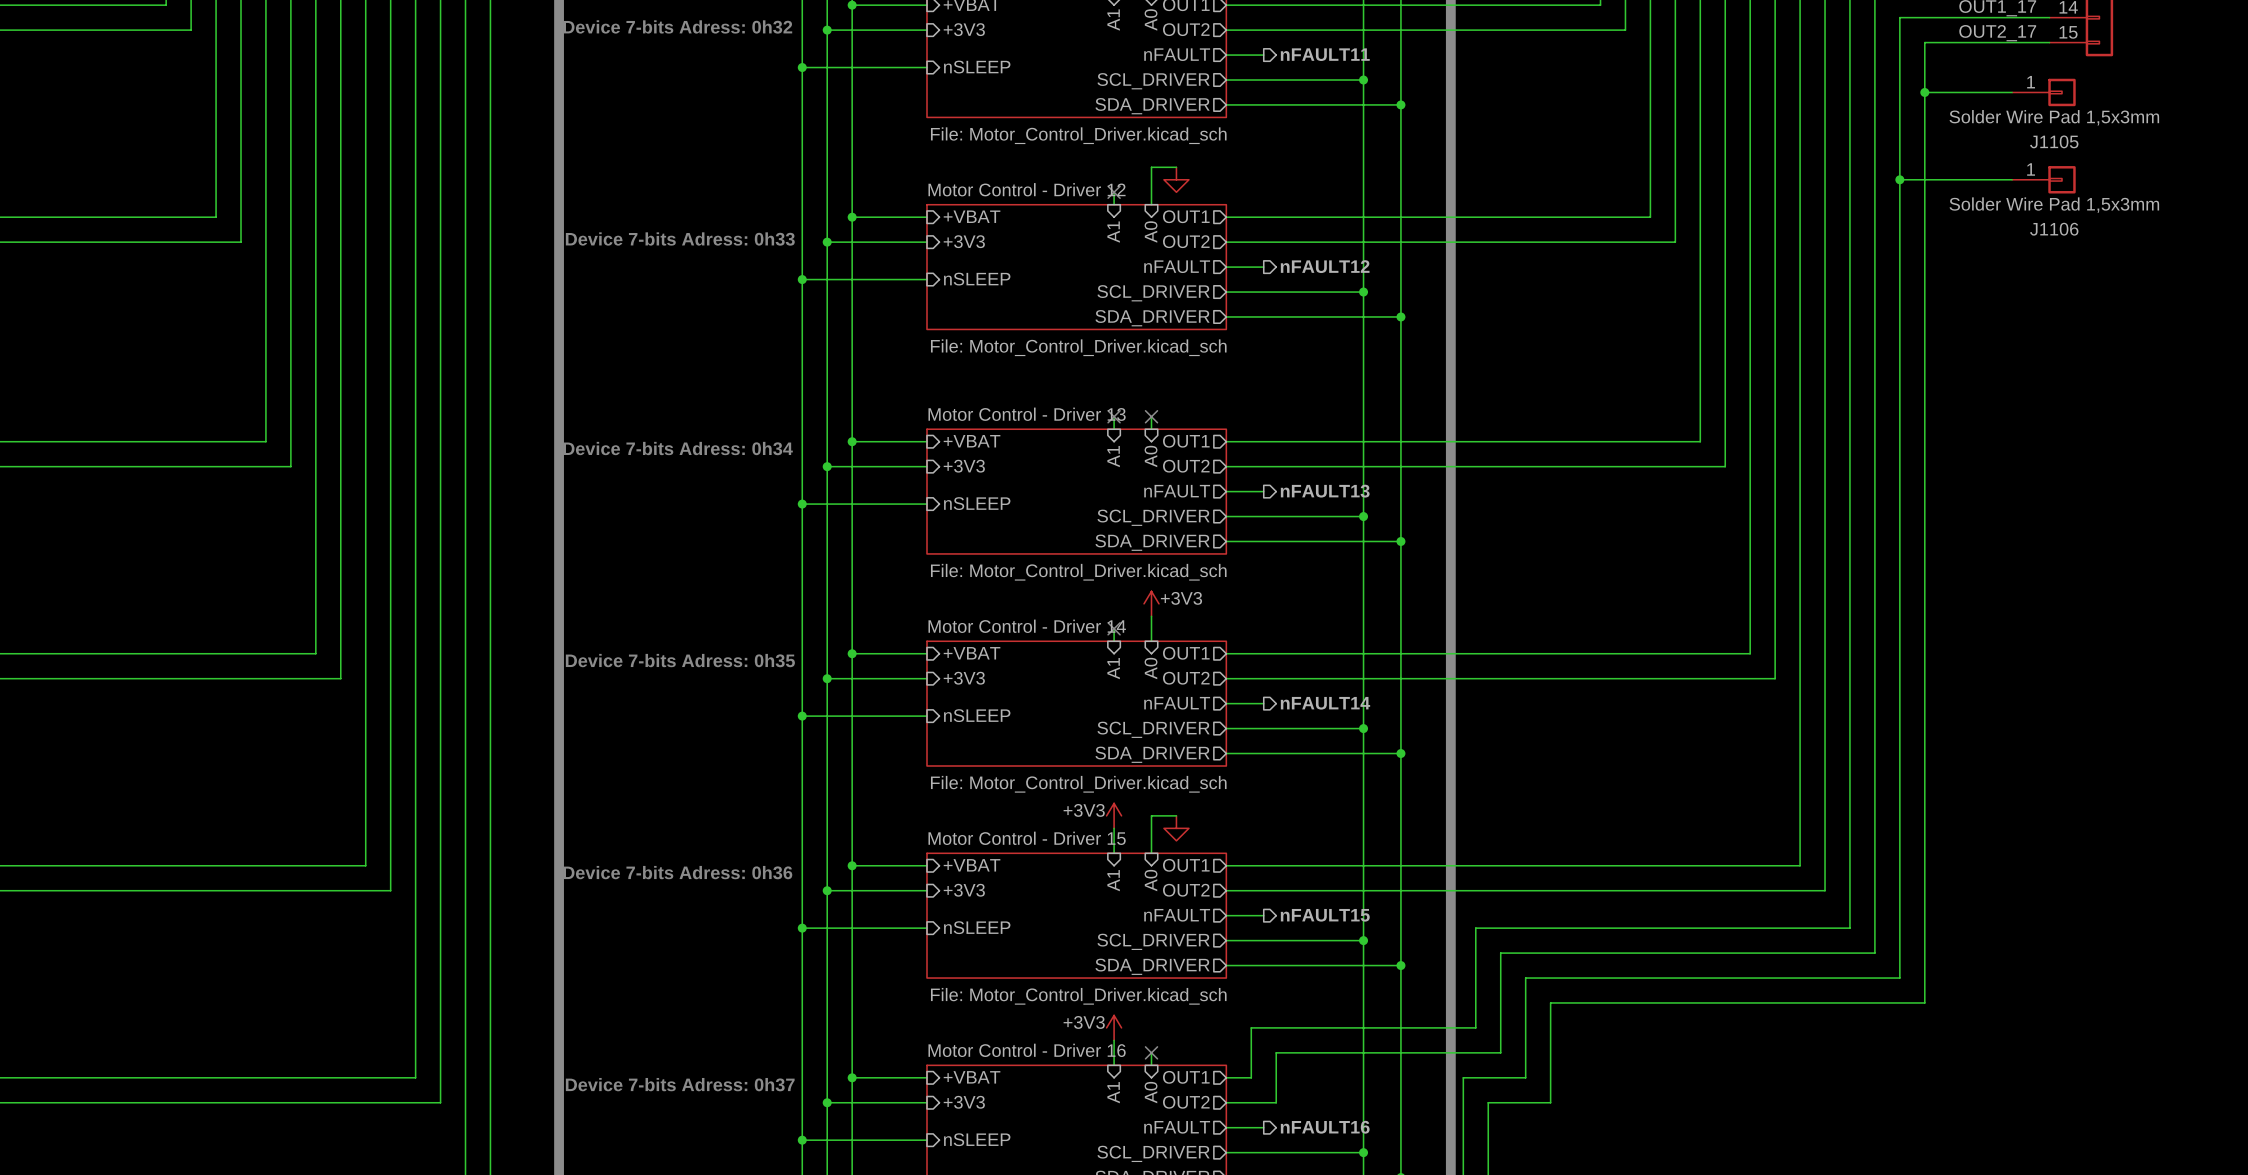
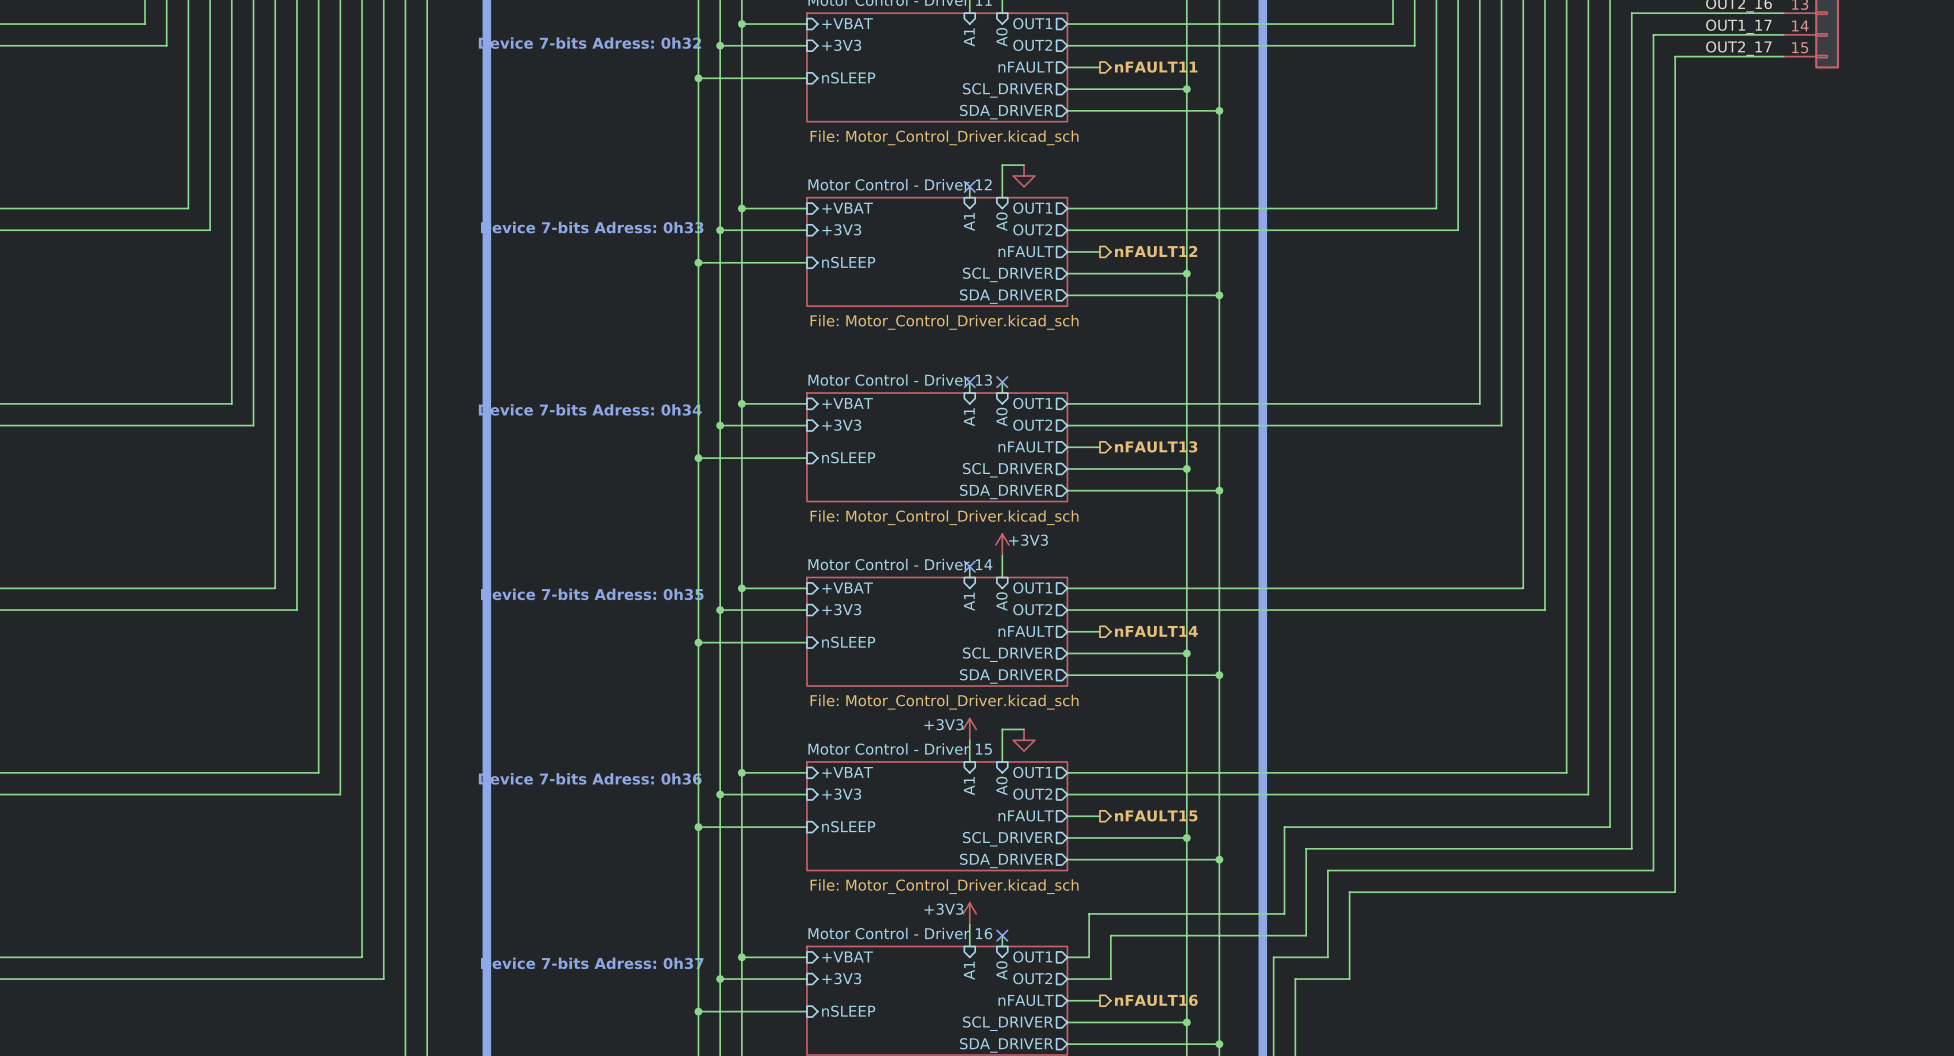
wire: (1924, 92) (2012, 92) -> none
junction: (1924, 92) -> none
J1105: Solder Wire Pad 1,5x3mm (2043, 92) -> none
wire: (1899, 179) (2012, 179) -> none
junction: (1899, 179) -> none
J1106: Solder Wire Pad 1,5x3mm (2043, 179) -> none

